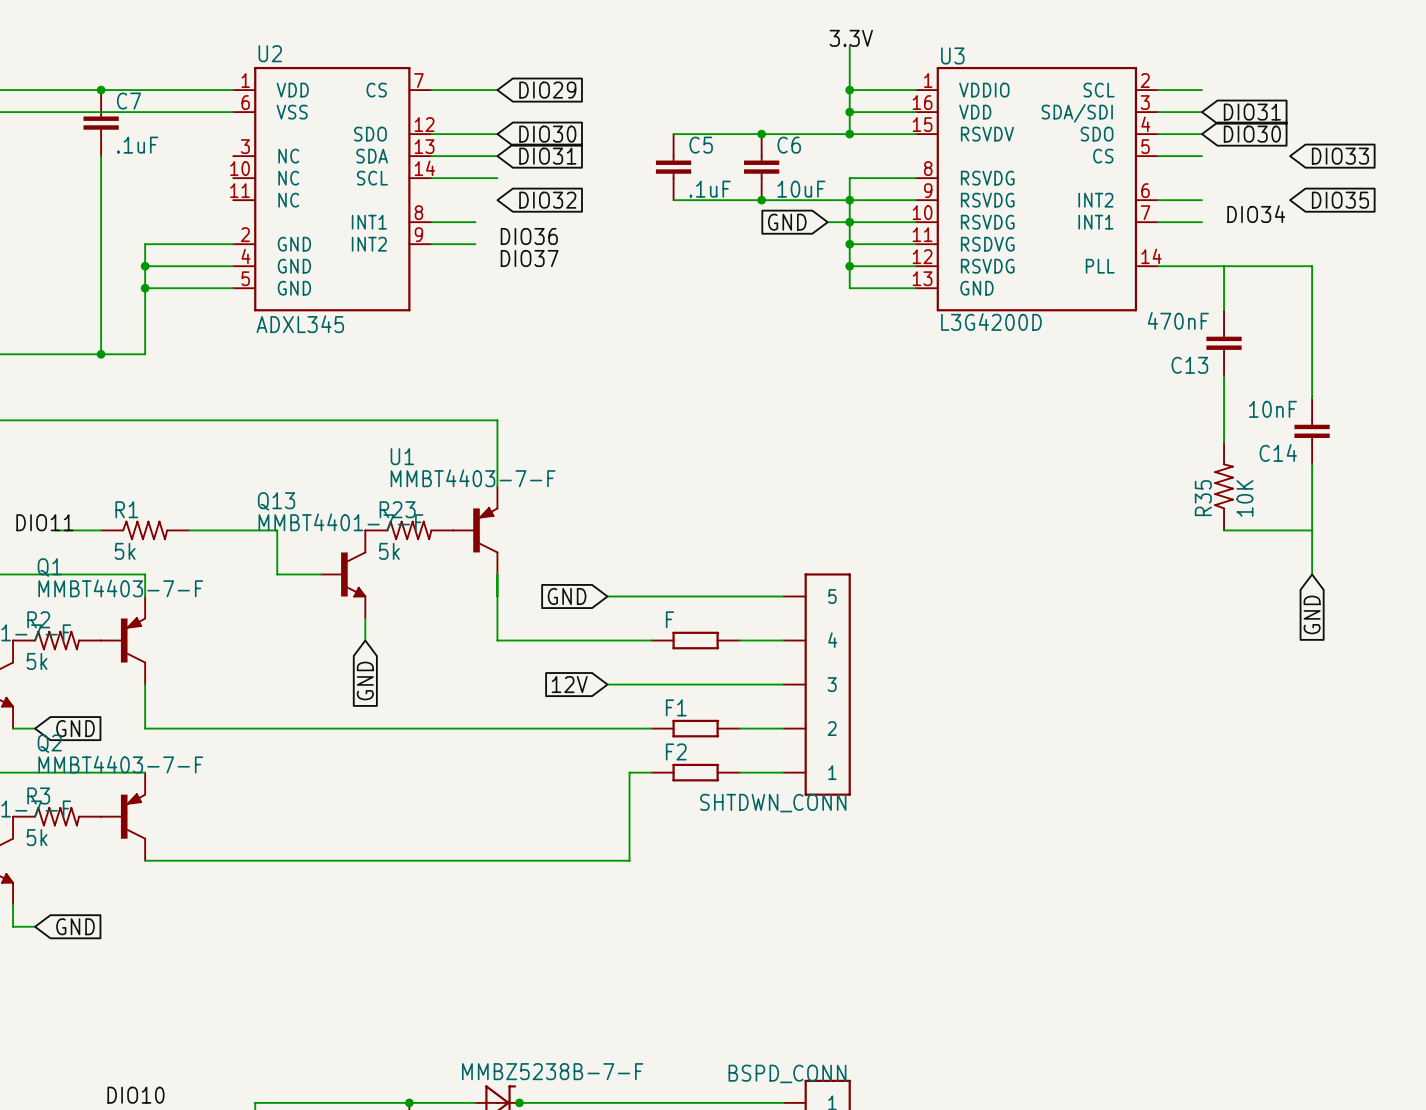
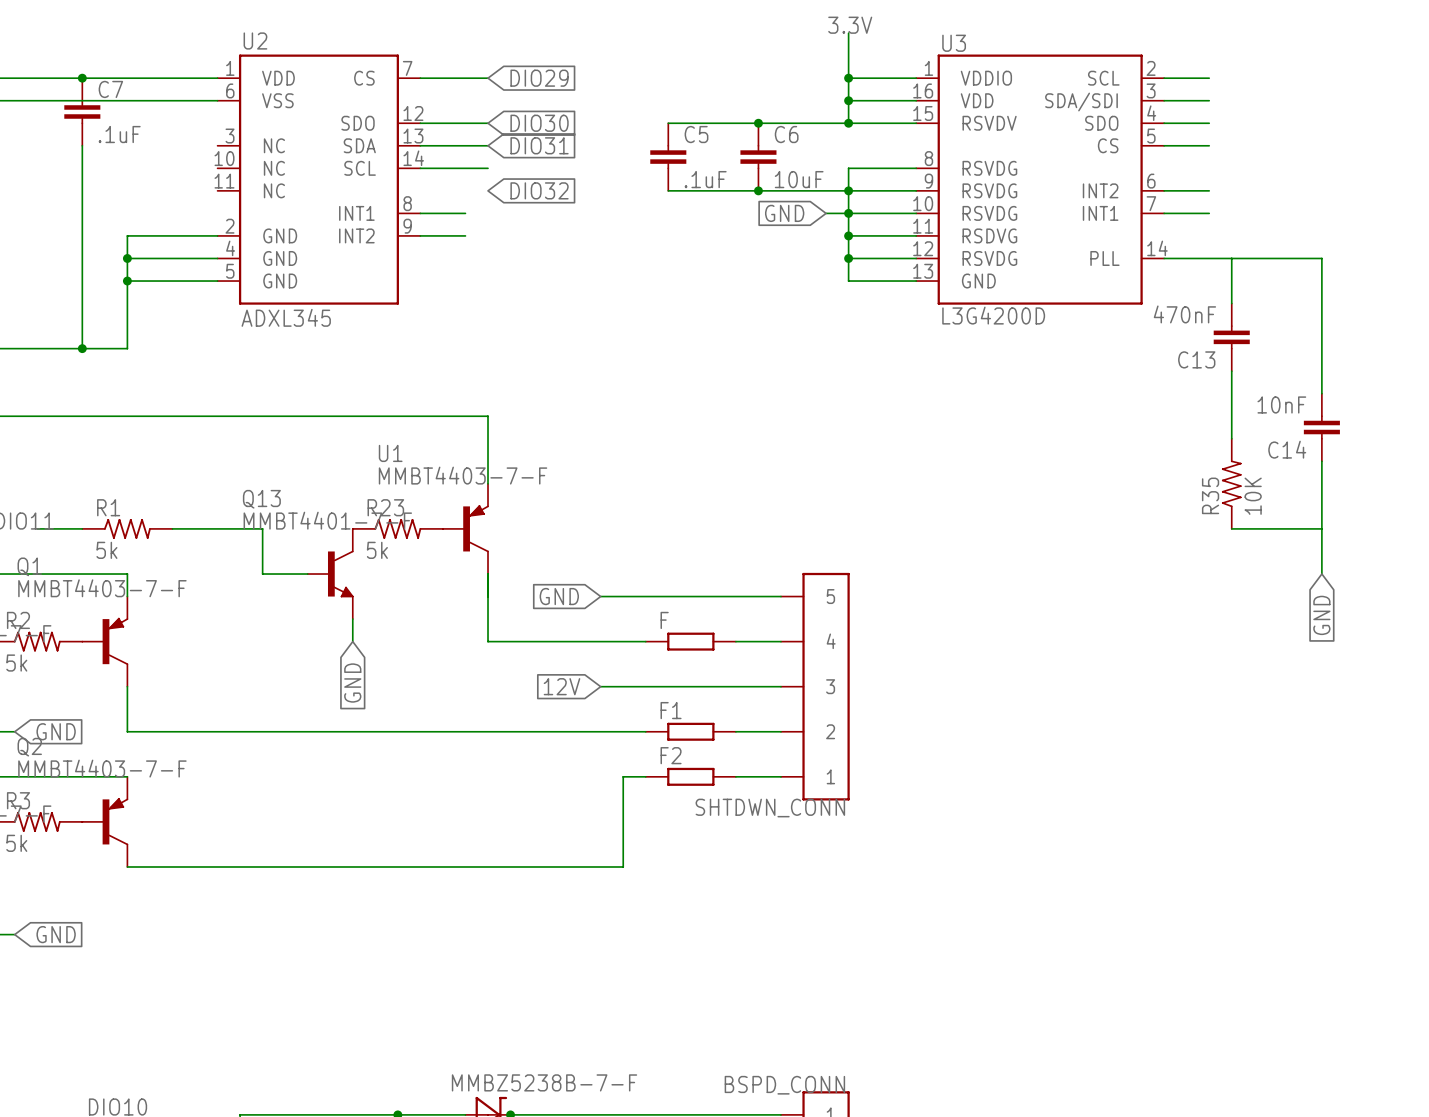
global label: DIO31 (1252, 112) -> none
global label: DIO30 (1252, 134) -> none
global label: DIO33 (1340, 156) -> none
global label: DIO35 (1340, 200) -> none
label: DIO34 (1256, 214) -> none
label: DIO36 (529, 236) -> none
label: DIO37 (529, 258) -> none

